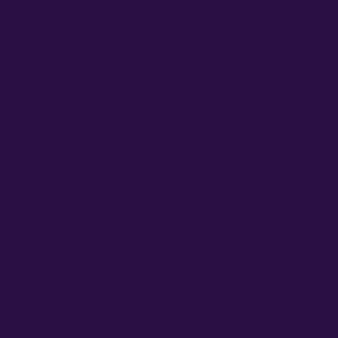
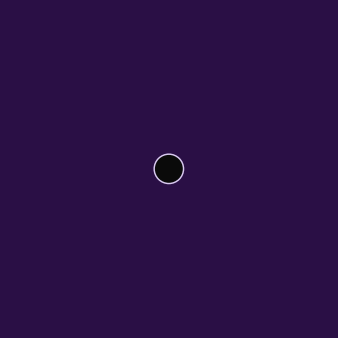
part: none -> (168, 168)

